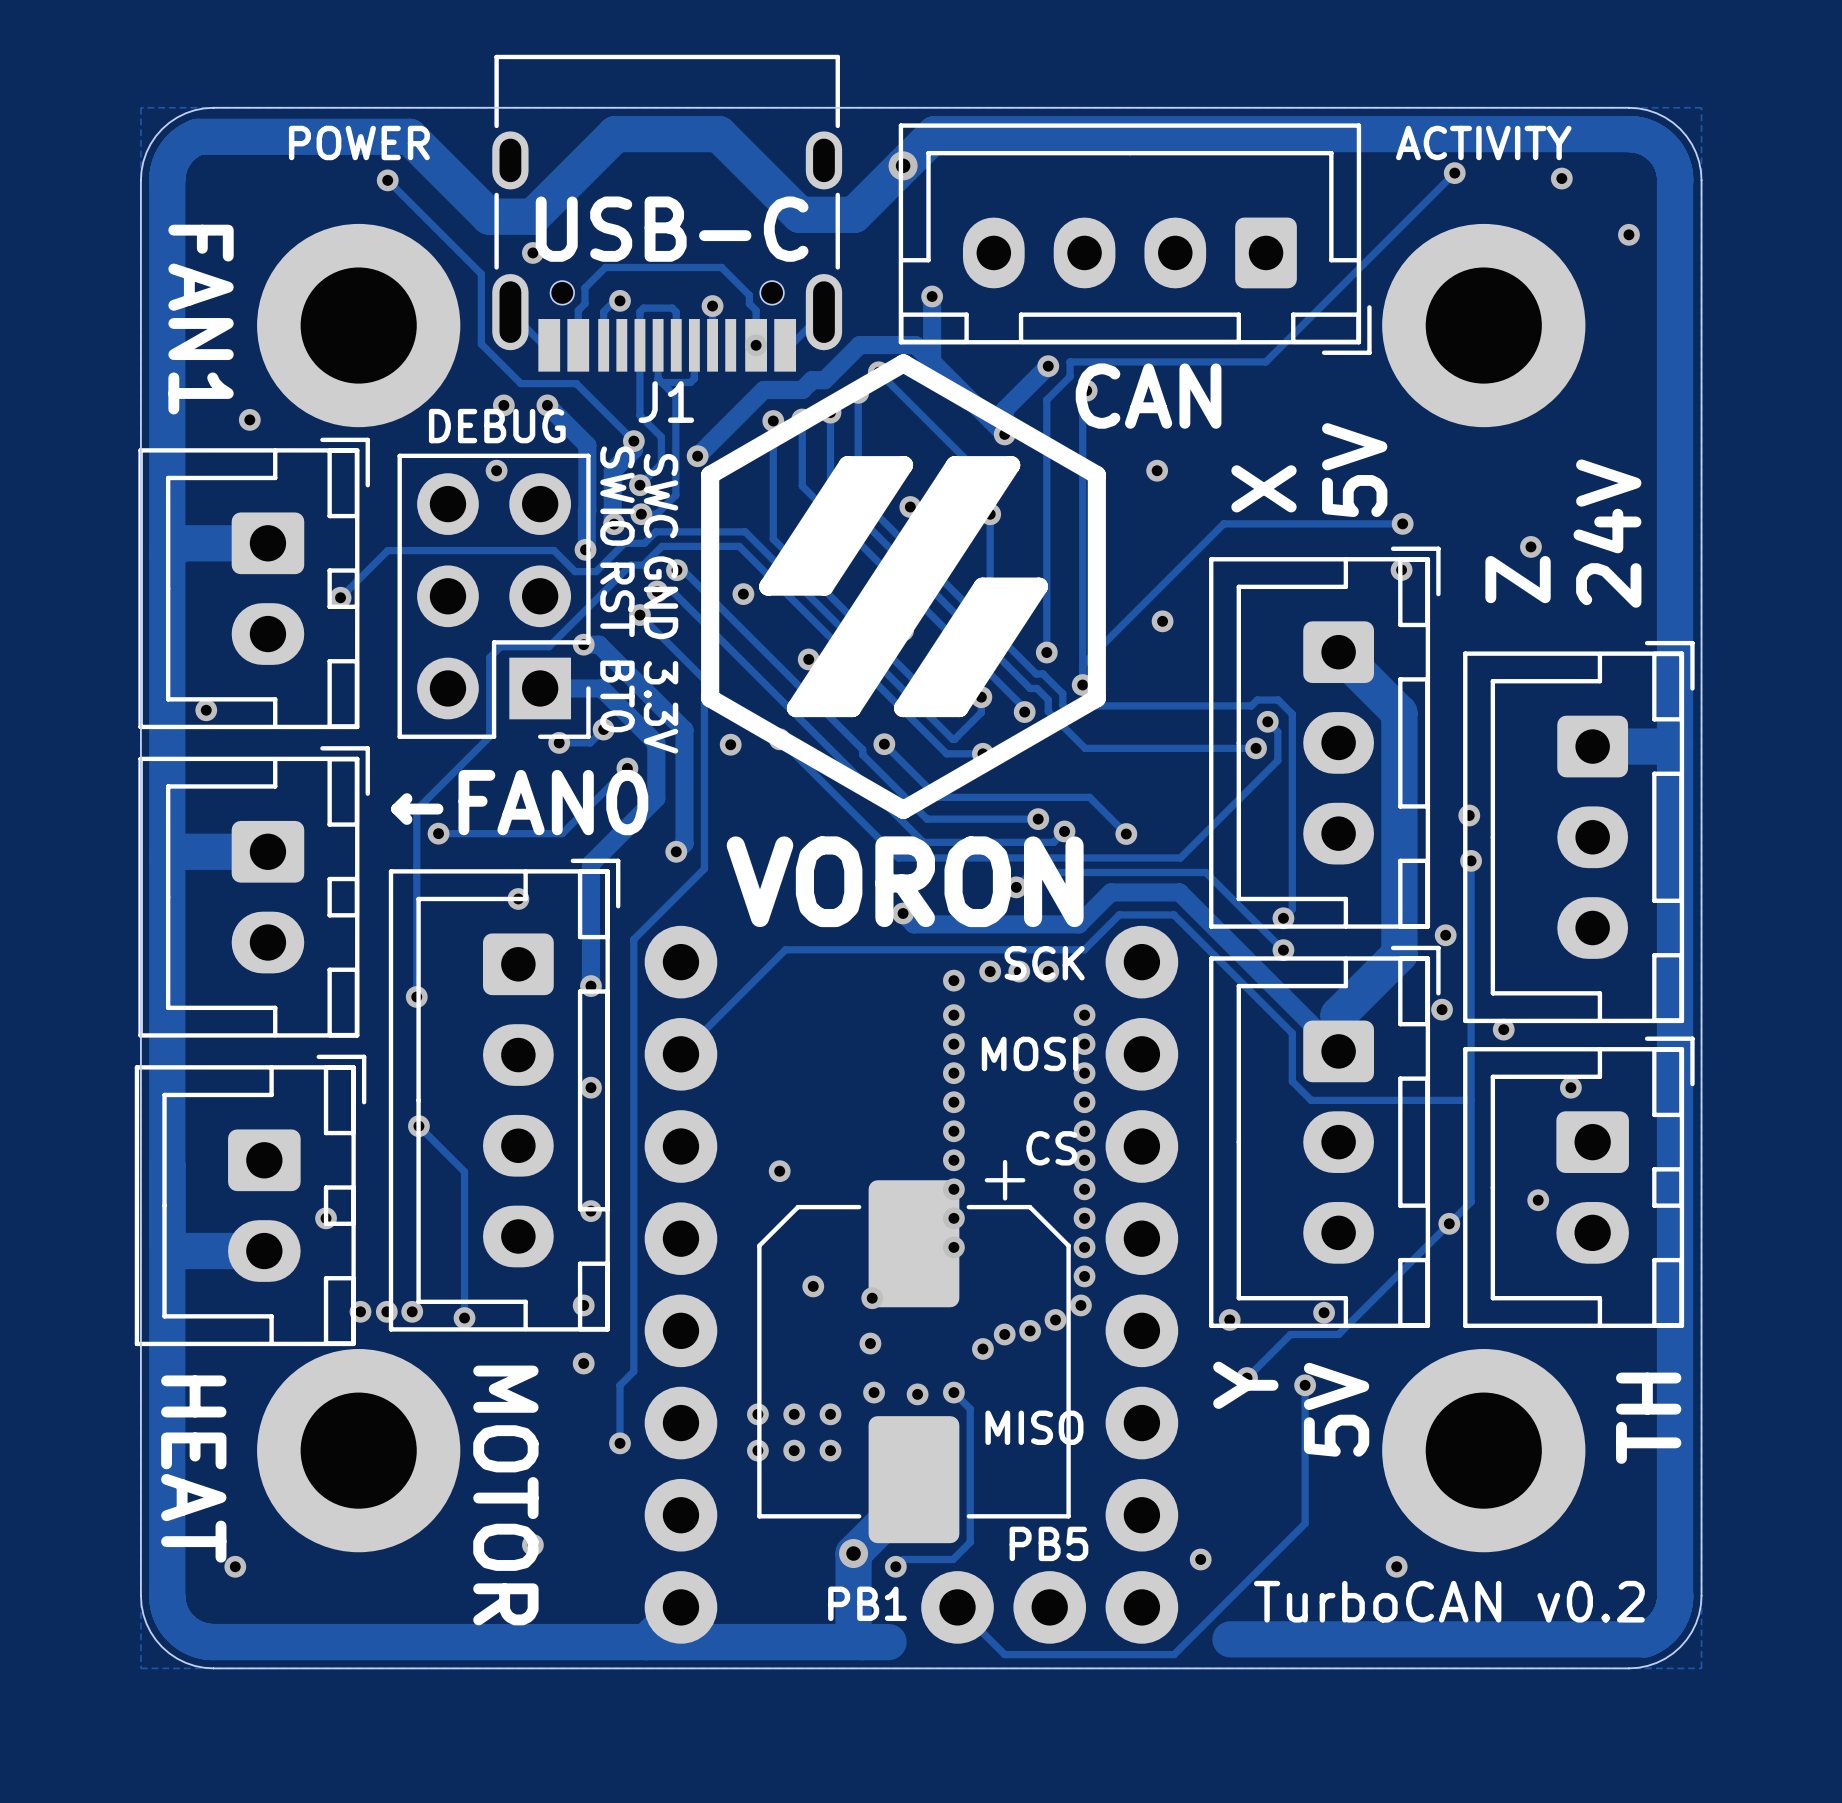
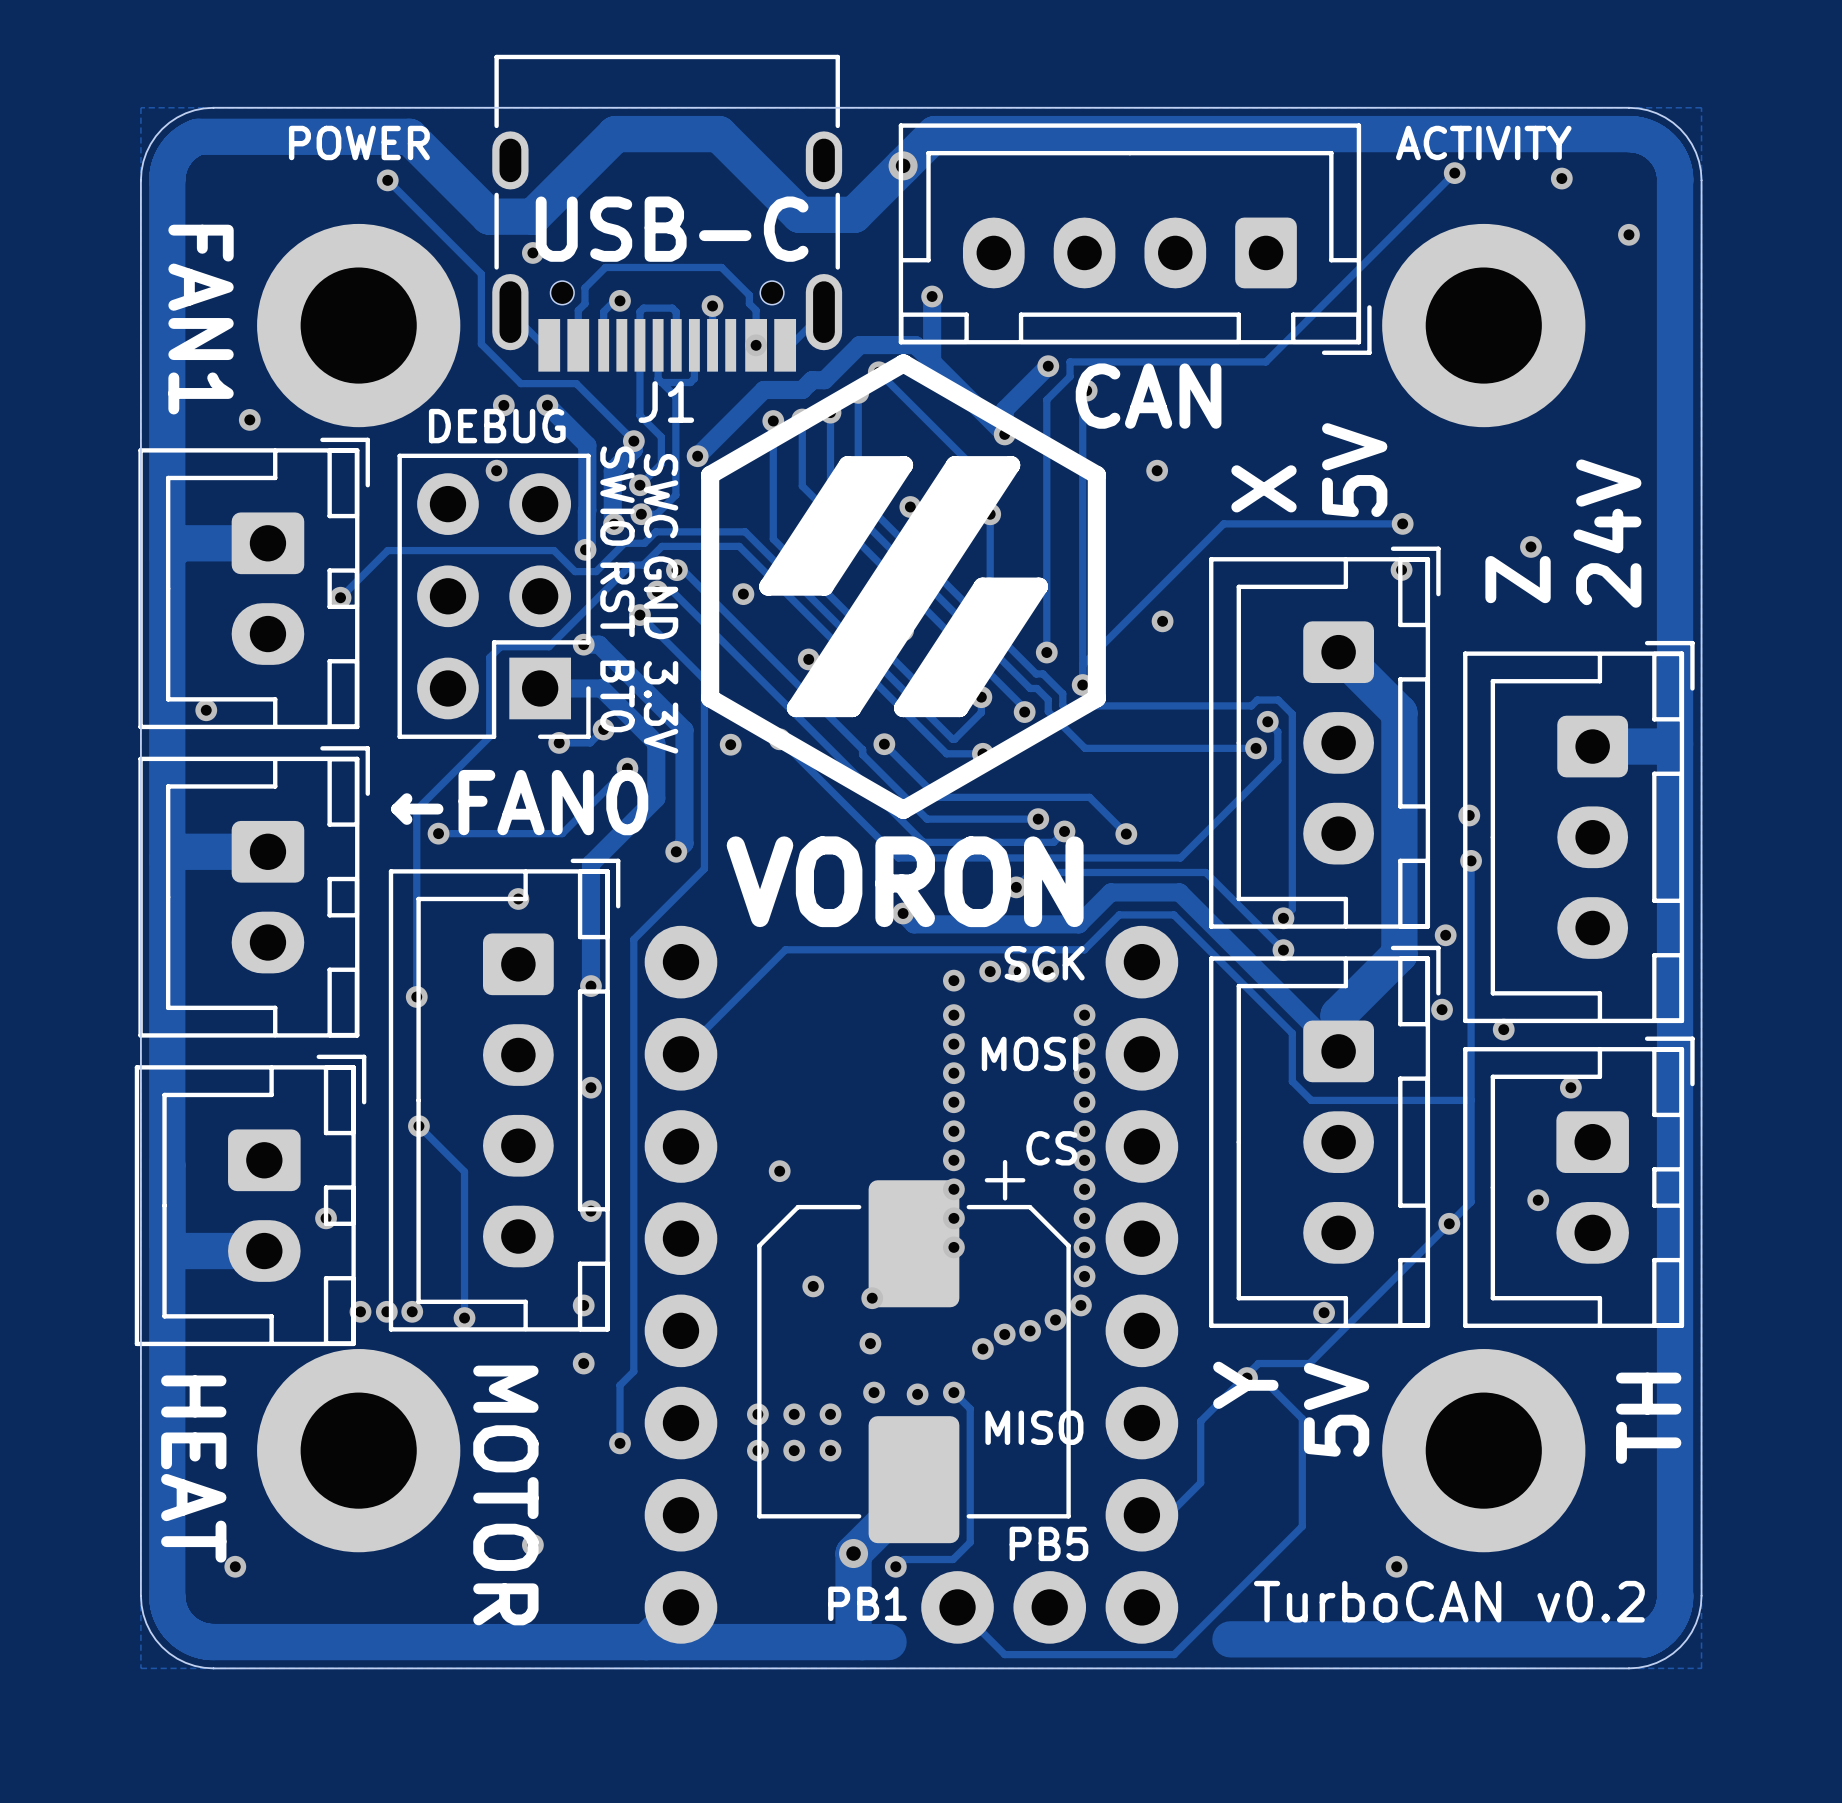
via: (1229, 1319) -> none
track: (1338, 1334) (1290, 1334) (1247, 1378) -> (1338, 1334) (1309, 1363) (1258, 1363) (1200, 1421) (1200, 1482) (1168, 1515) (1141, 1515)
track: (1305, 1385) (1305, 1523) (1302, 1526) -> (1268, 1385) (1302, 1418) (1302, 1526)
via: (1305, 1385) -> none
via: (1200, 1559) -> none

